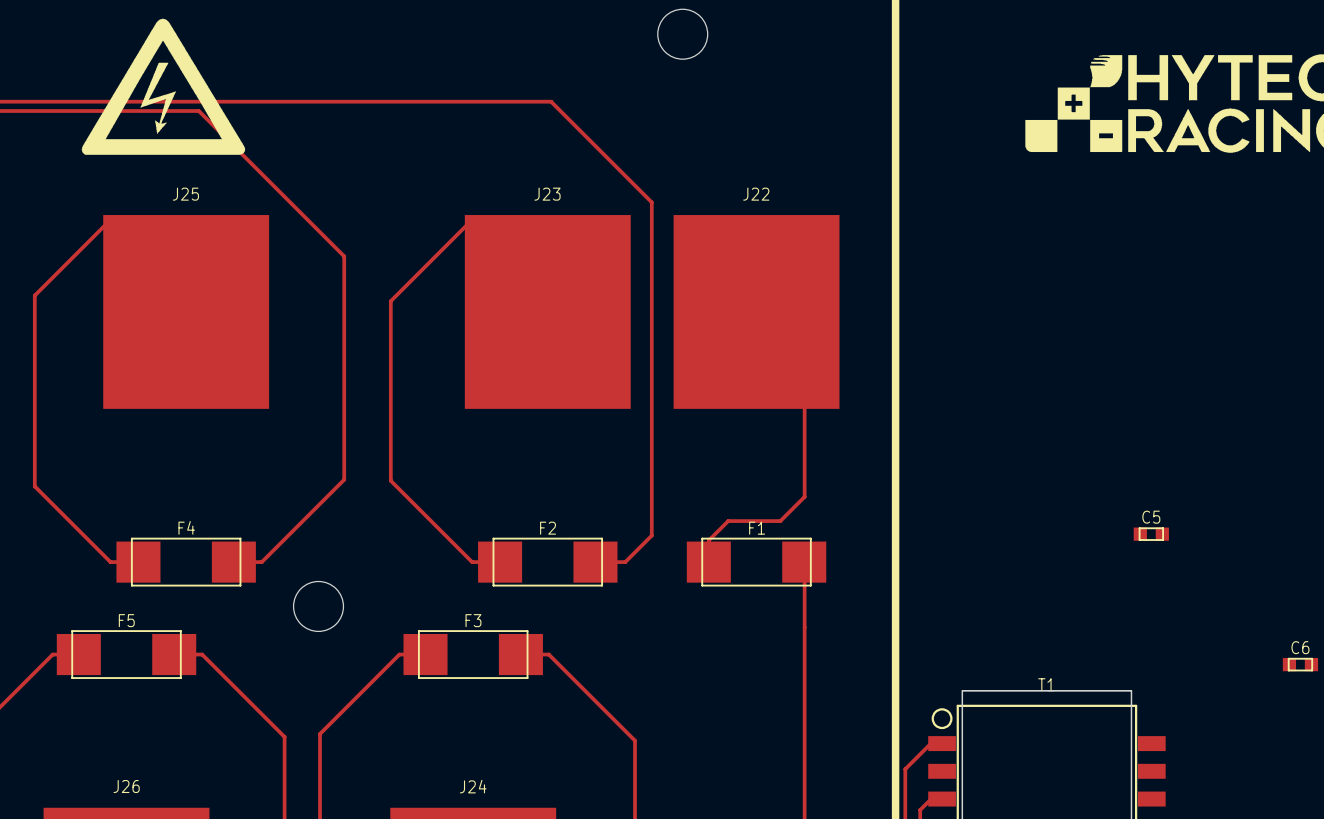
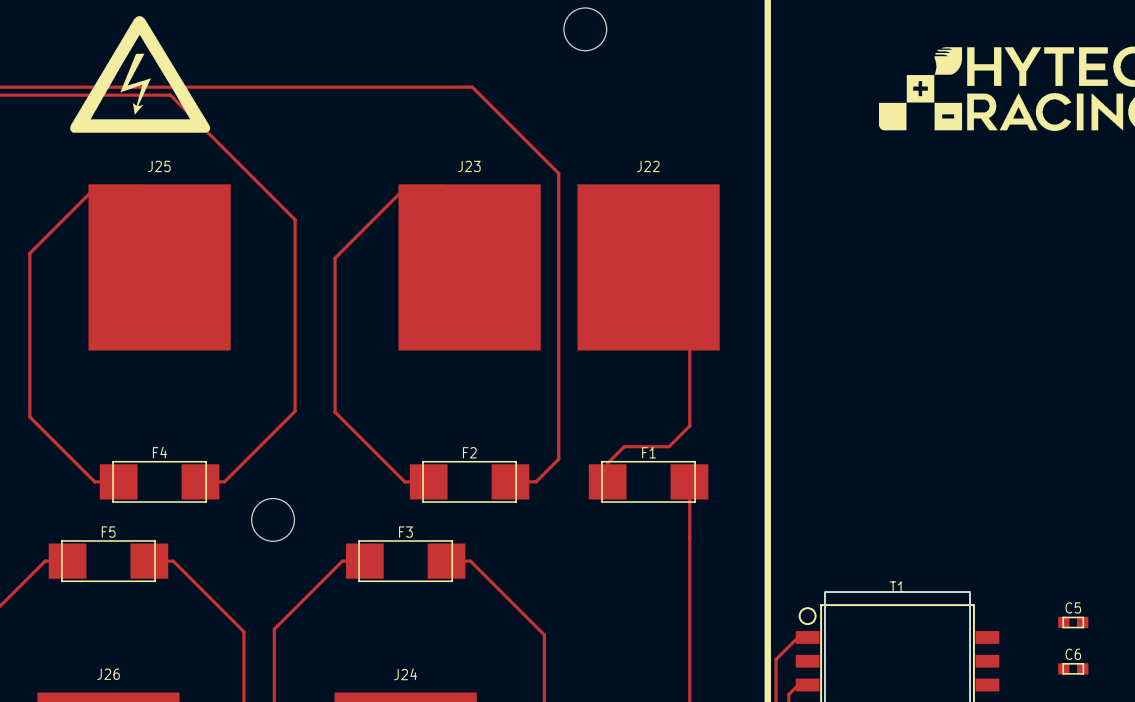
C5 position: (1151, 534) -> (1073, 622)
C6 position: (1300, 664) -> (1073, 668)

